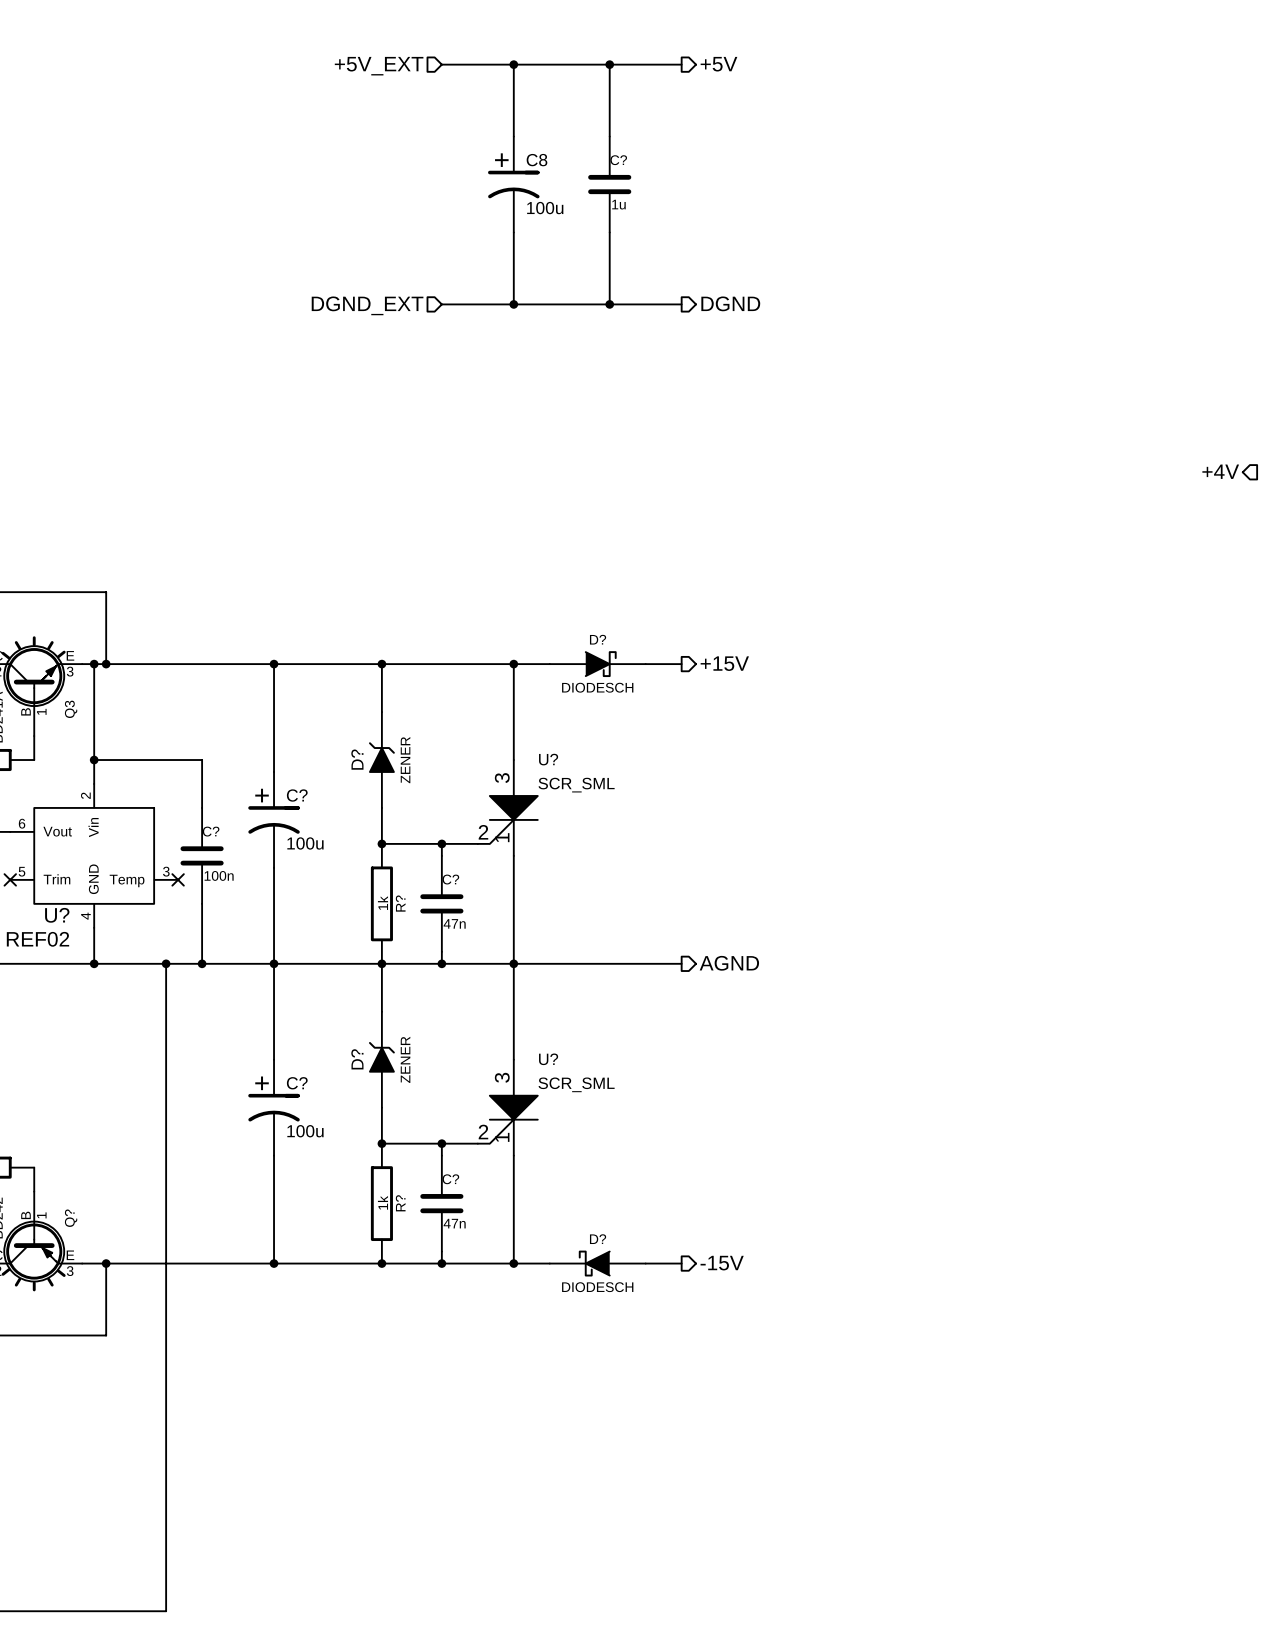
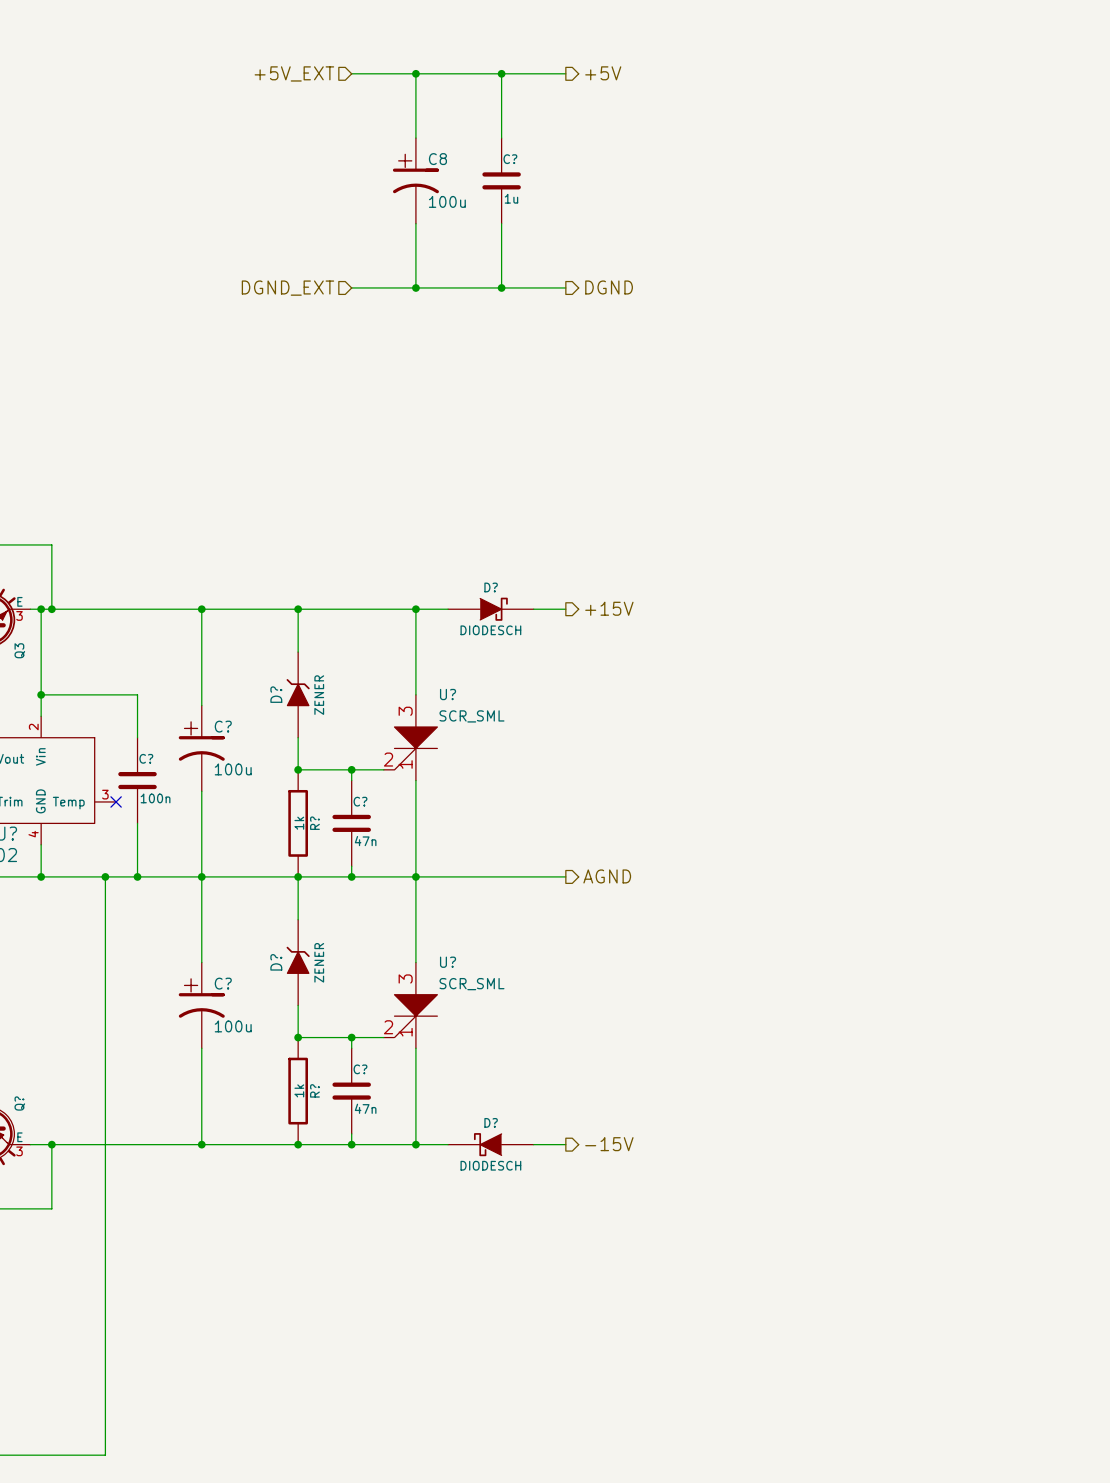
hierarchical label: +4V (1220, 471) -> none

